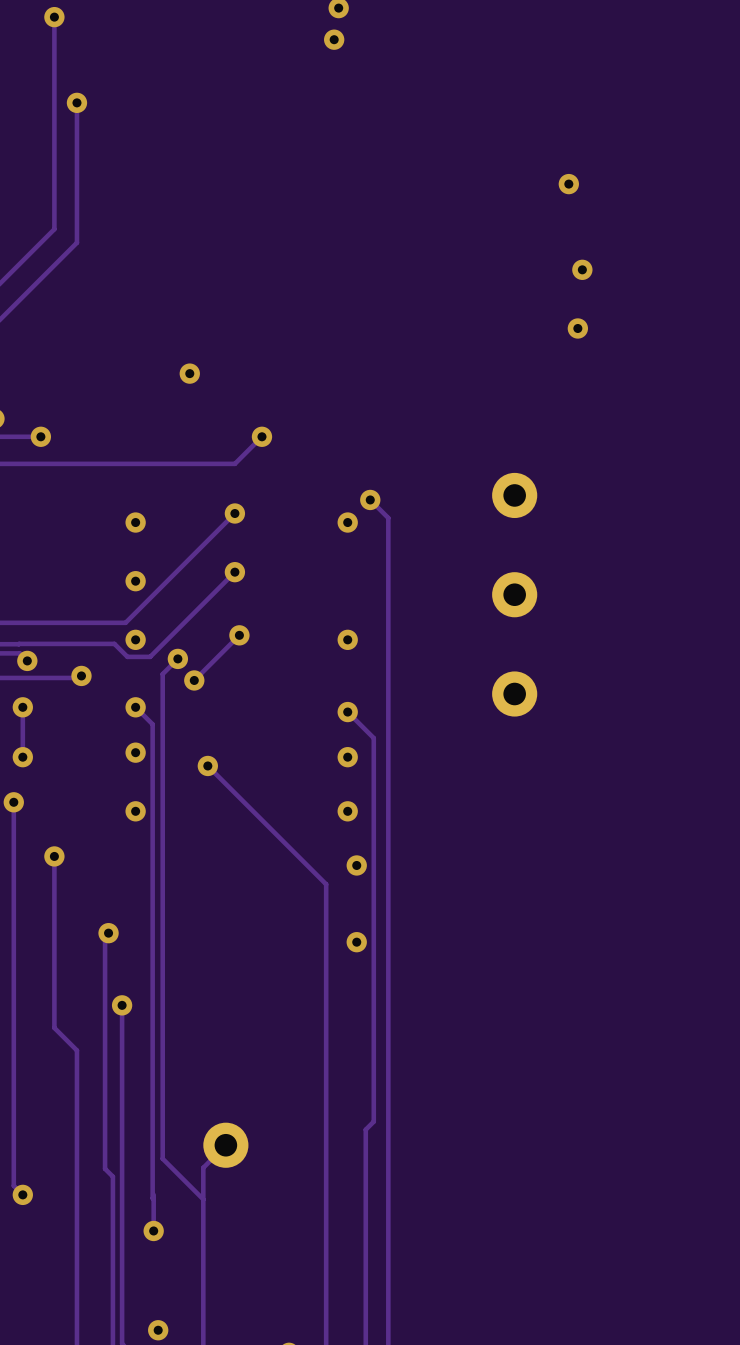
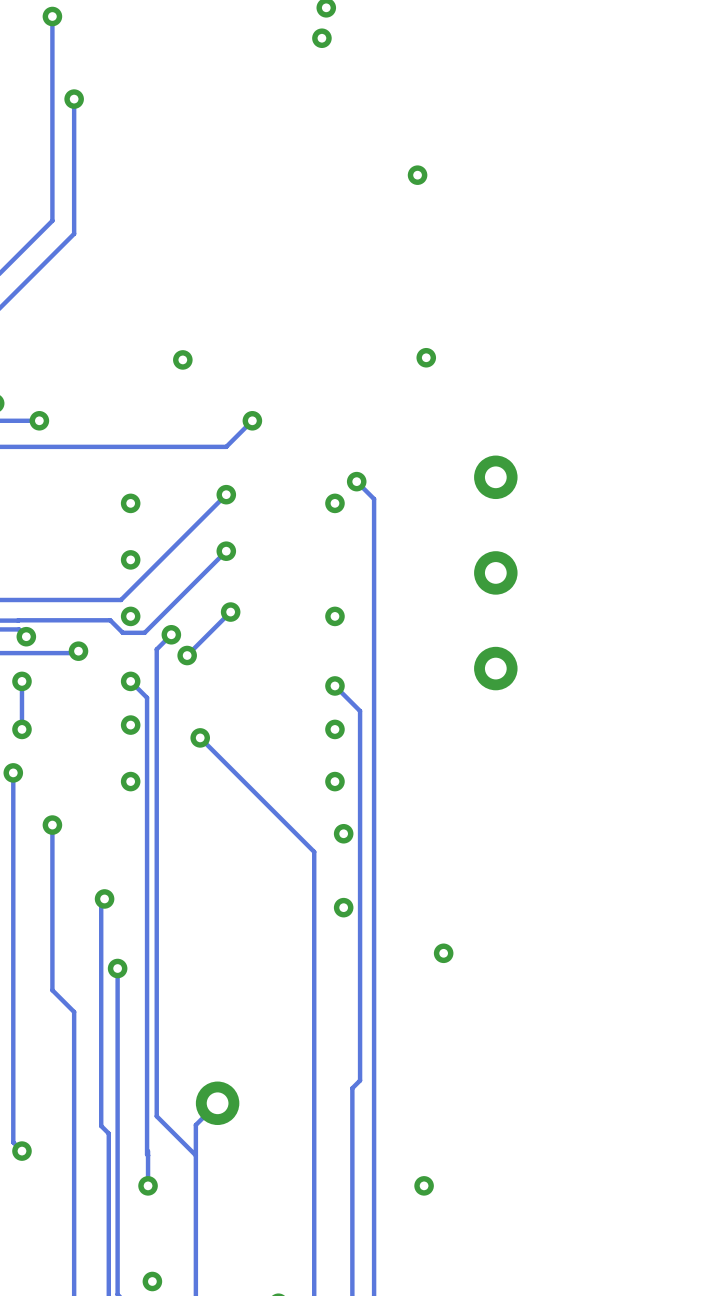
via: none -> (417, 175)
via: (568, 184) -> none
via: (582, 269) -> none
via: (577, 328) -> none
via: none -> (426, 357)
via: none -> (443, 953)
via: none -> (424, 1185)

